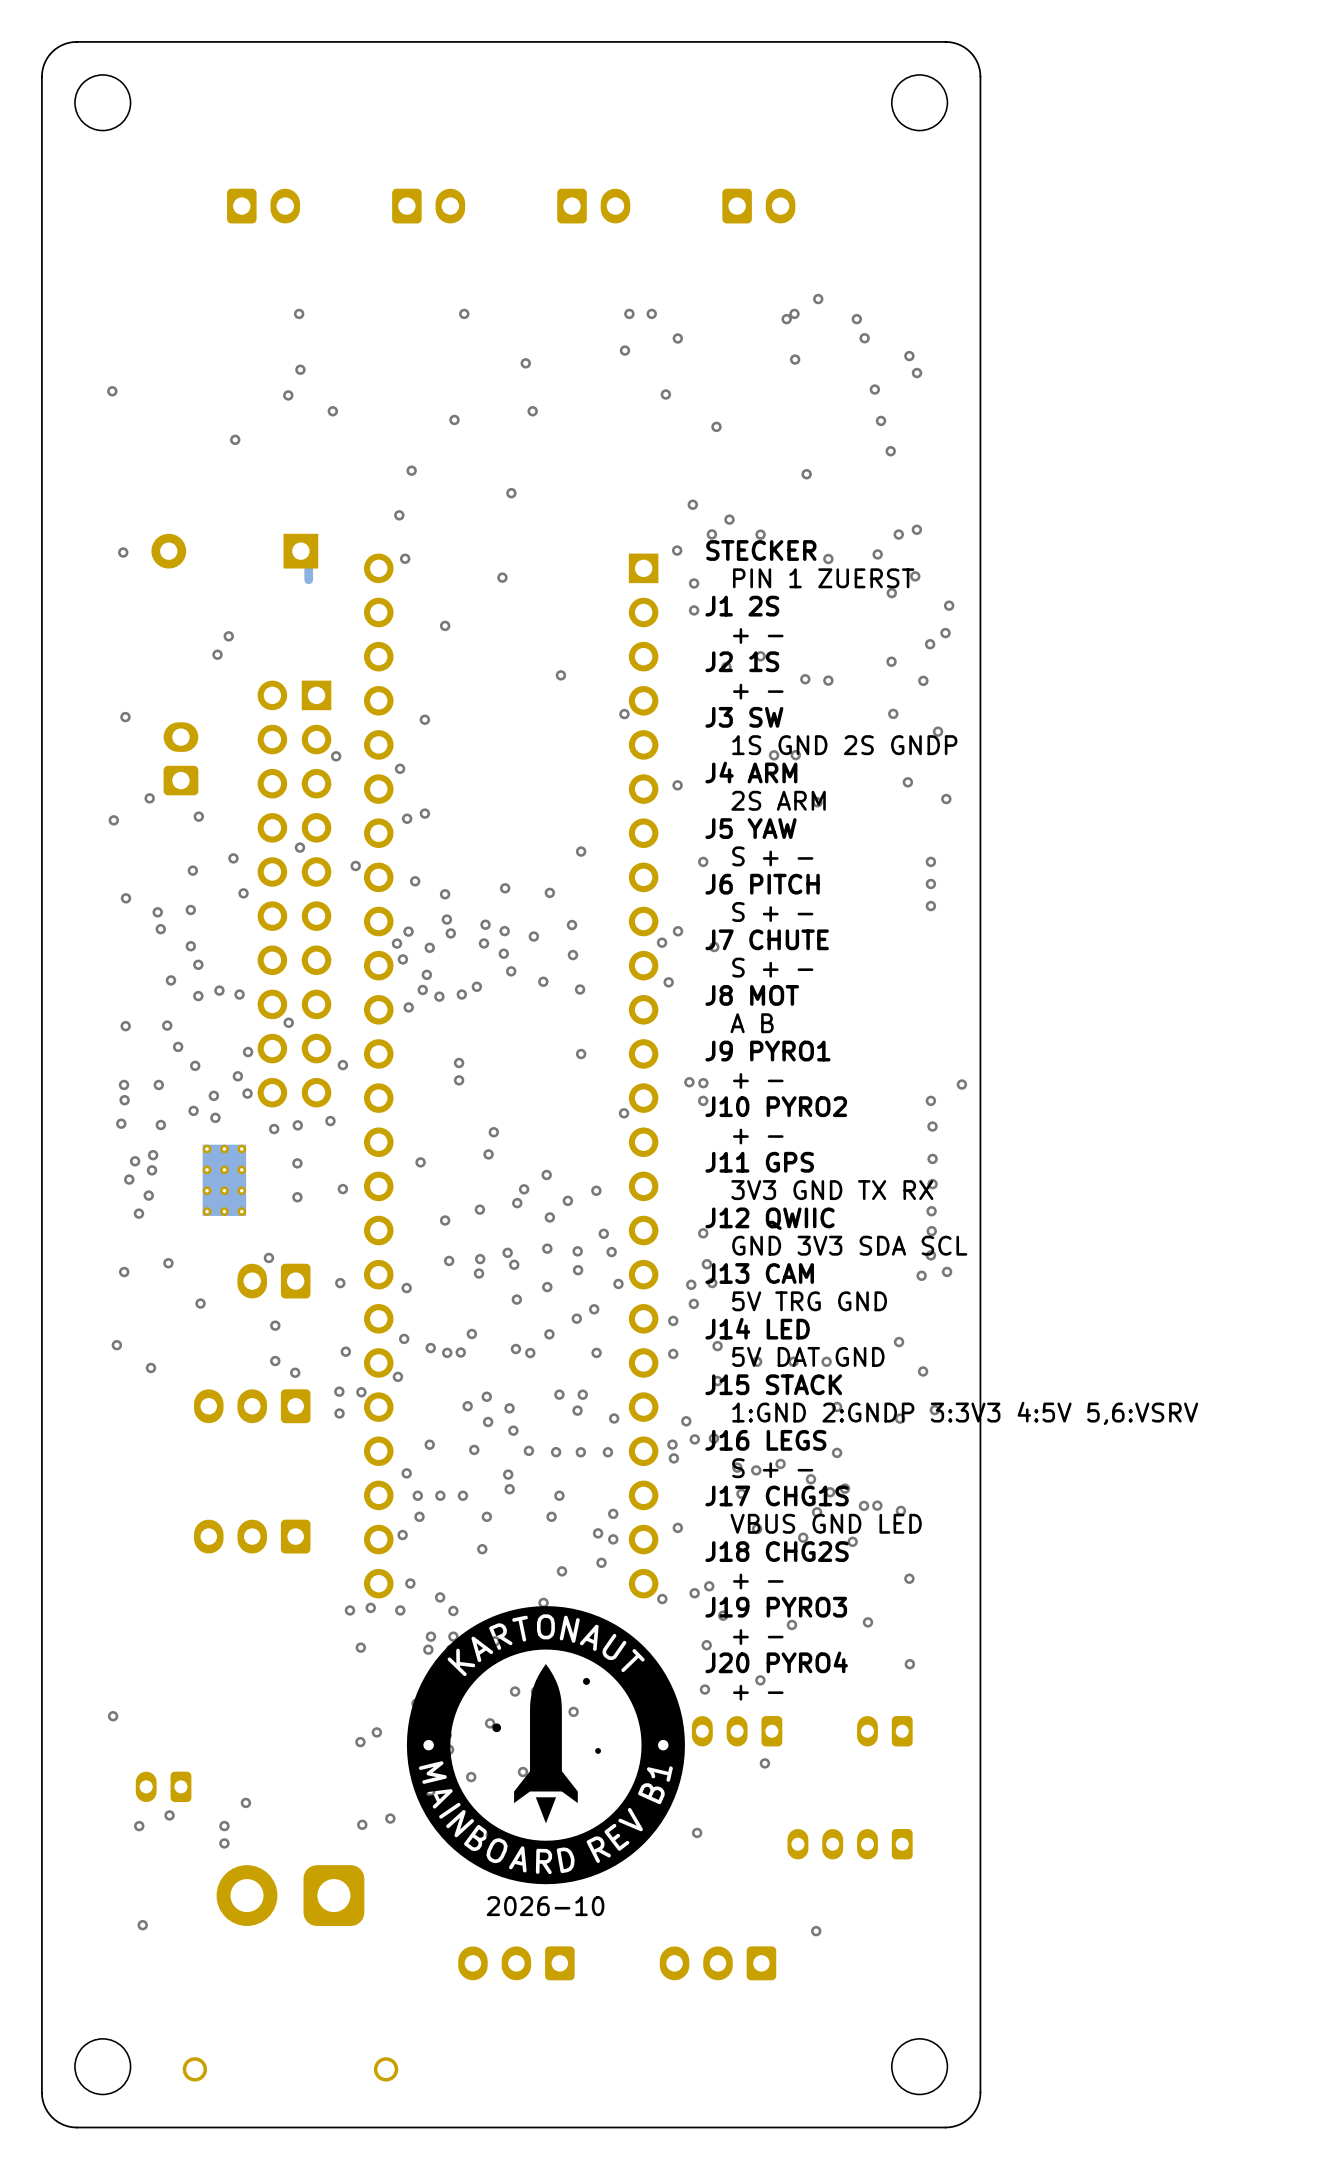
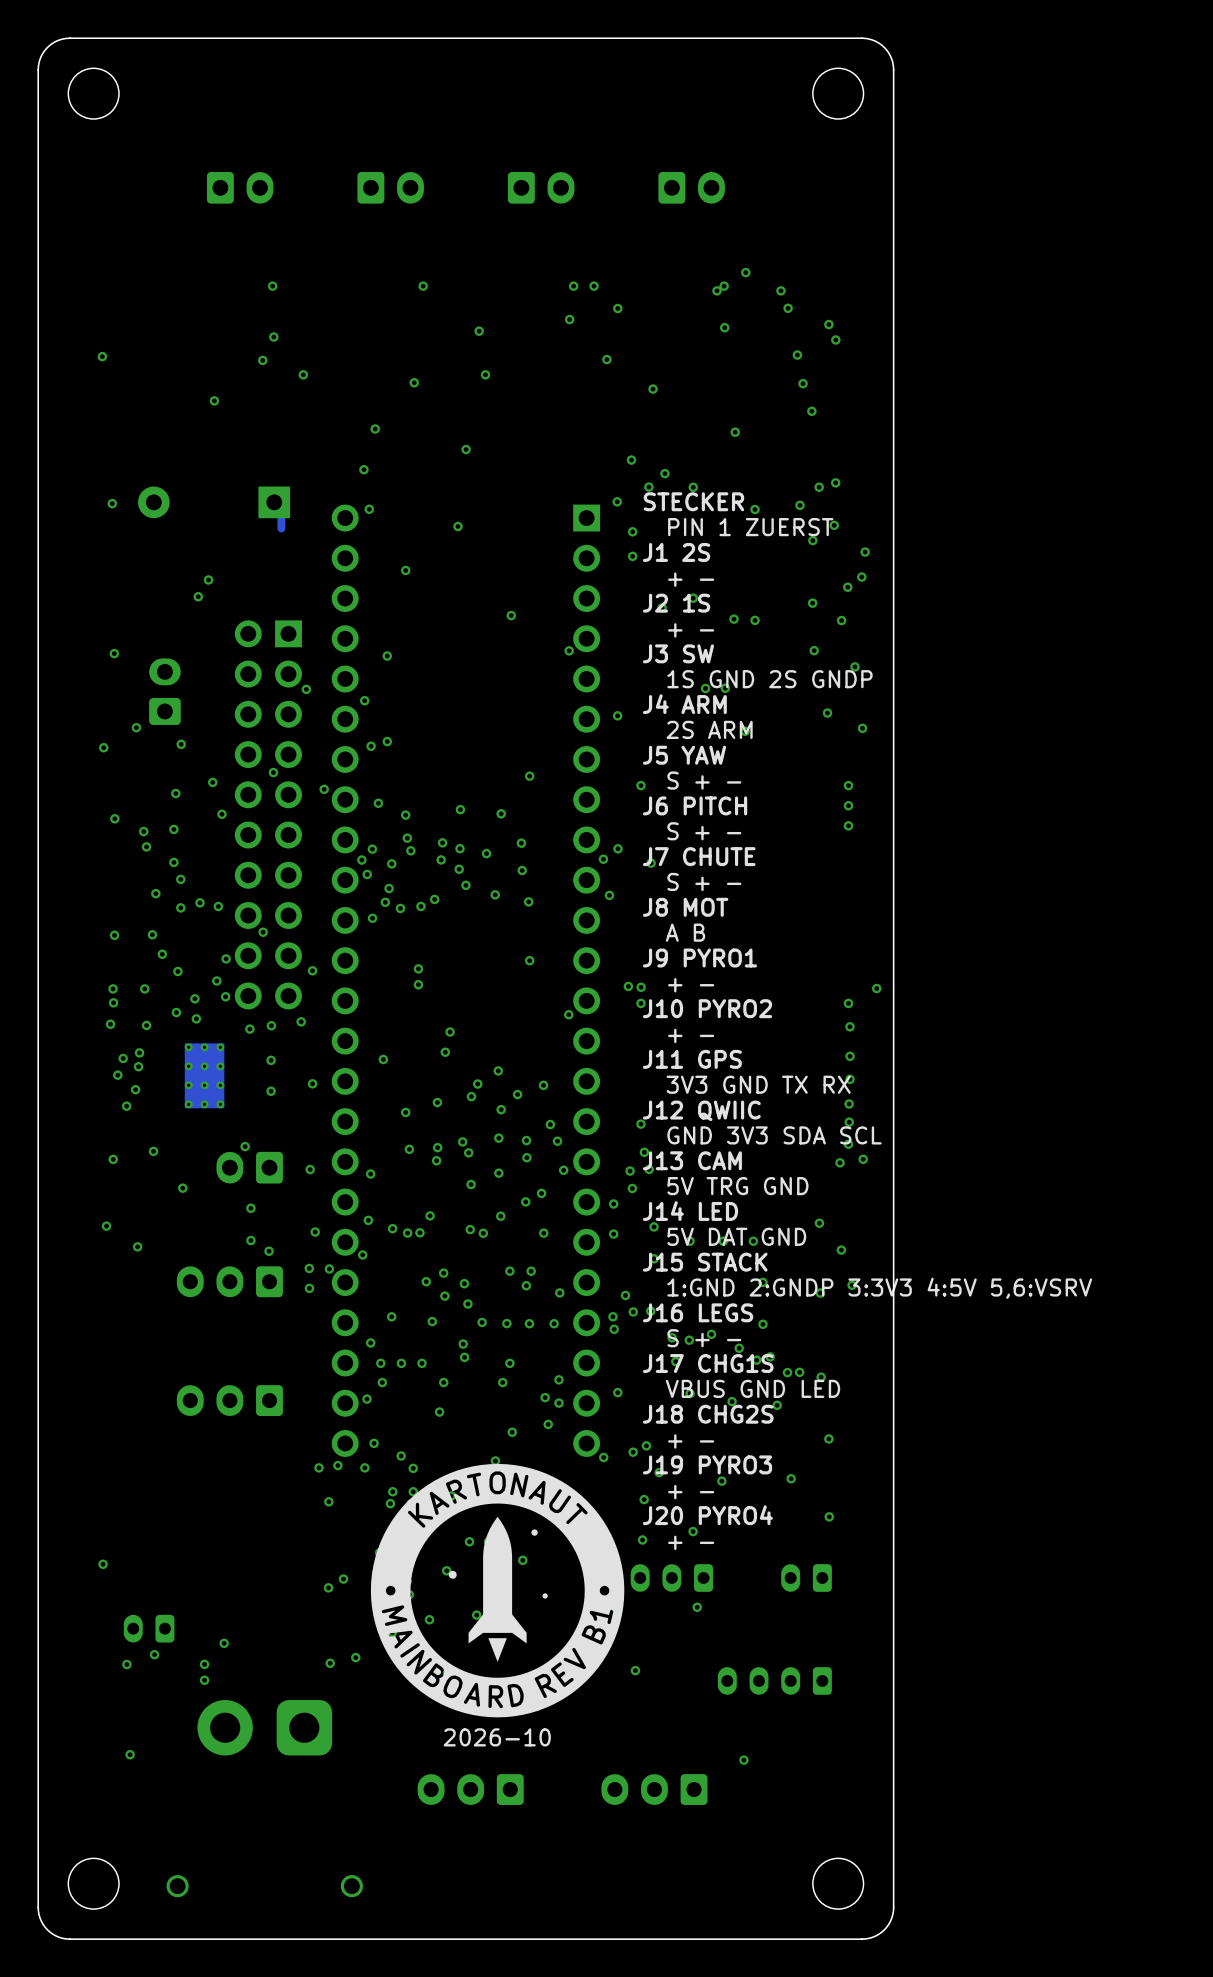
via: (817, 1512) -> none

